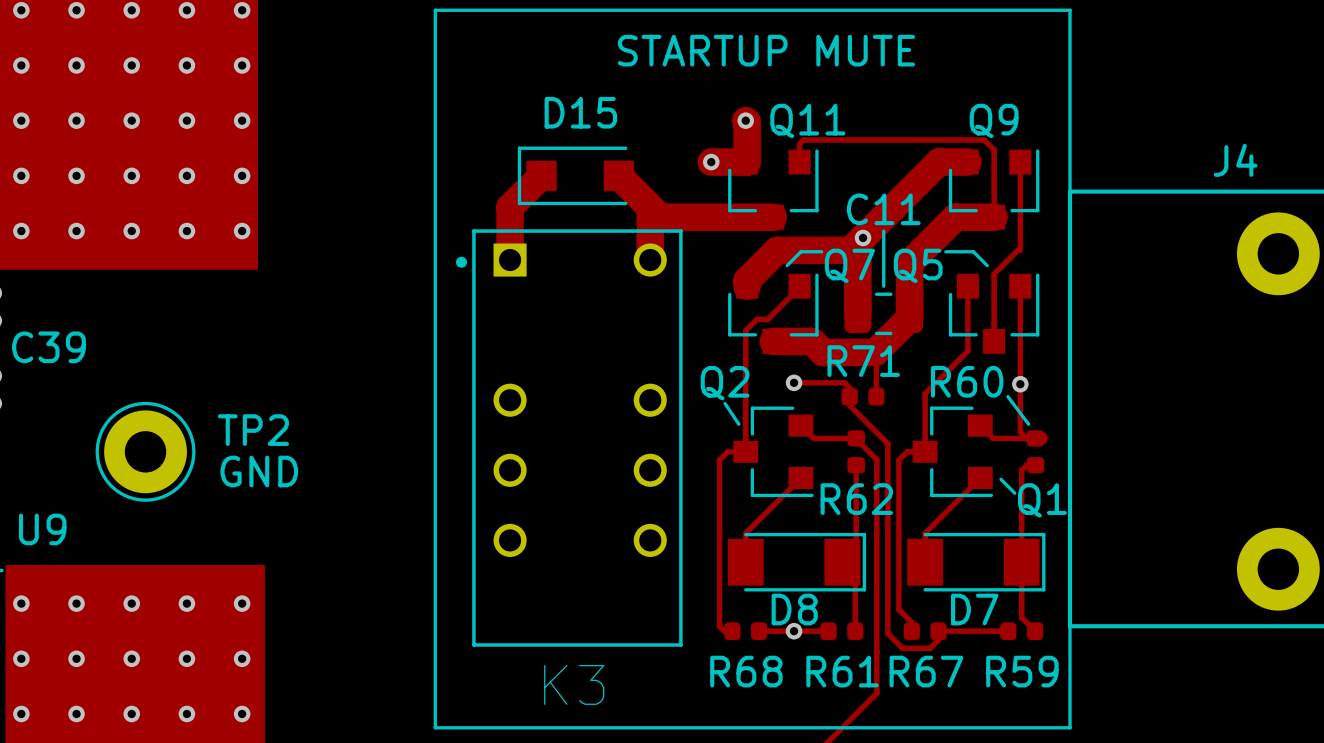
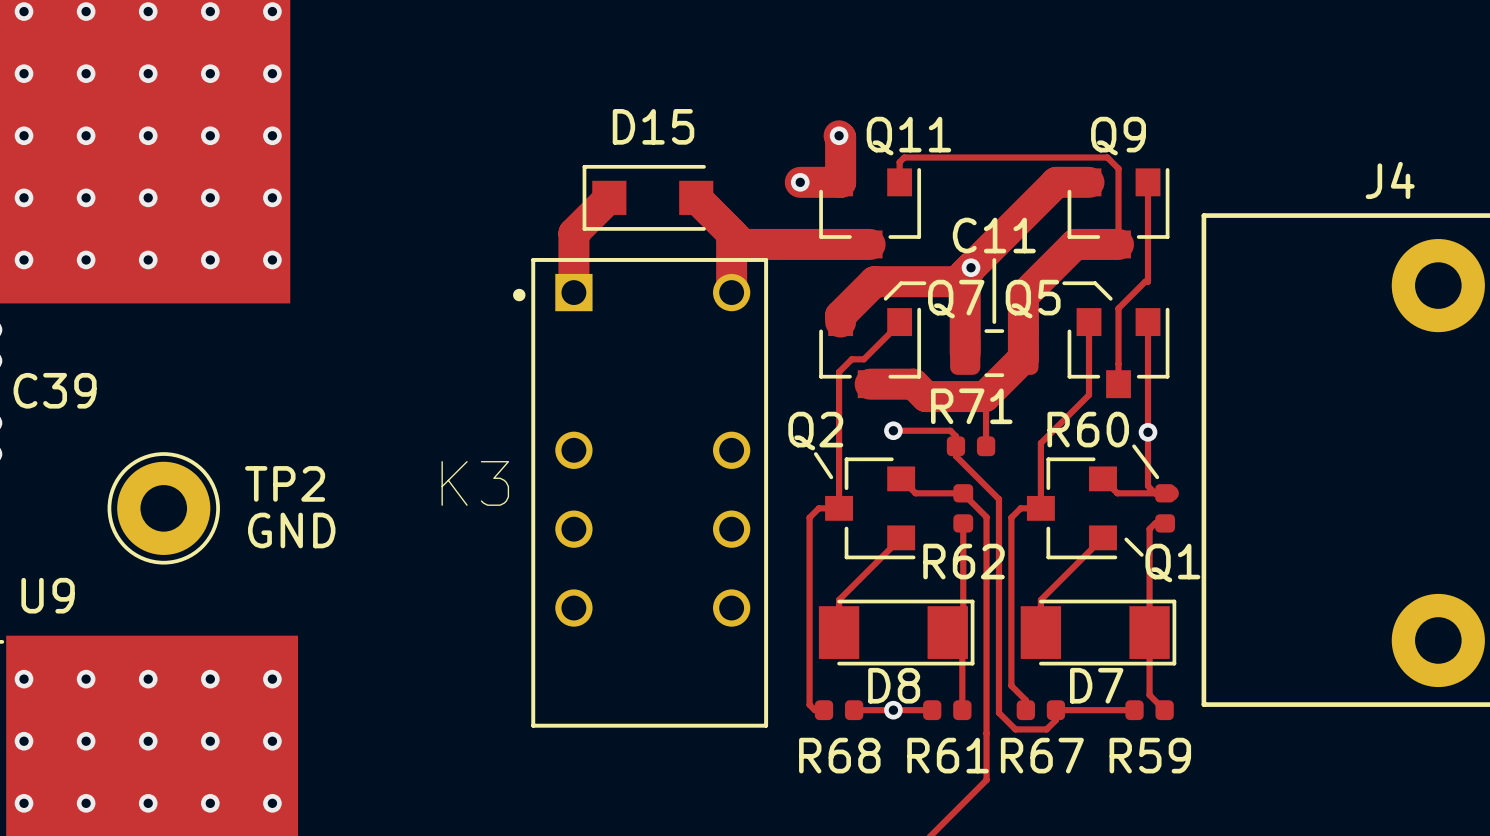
line: (435, 10) (435, 727) (1070, 727) (1070, 10) (435, 10) -> none
text: STARTUP MUTE (766, 50) -> none
K3 name position: K3 (574, 684) -> K3 (475, 483)

